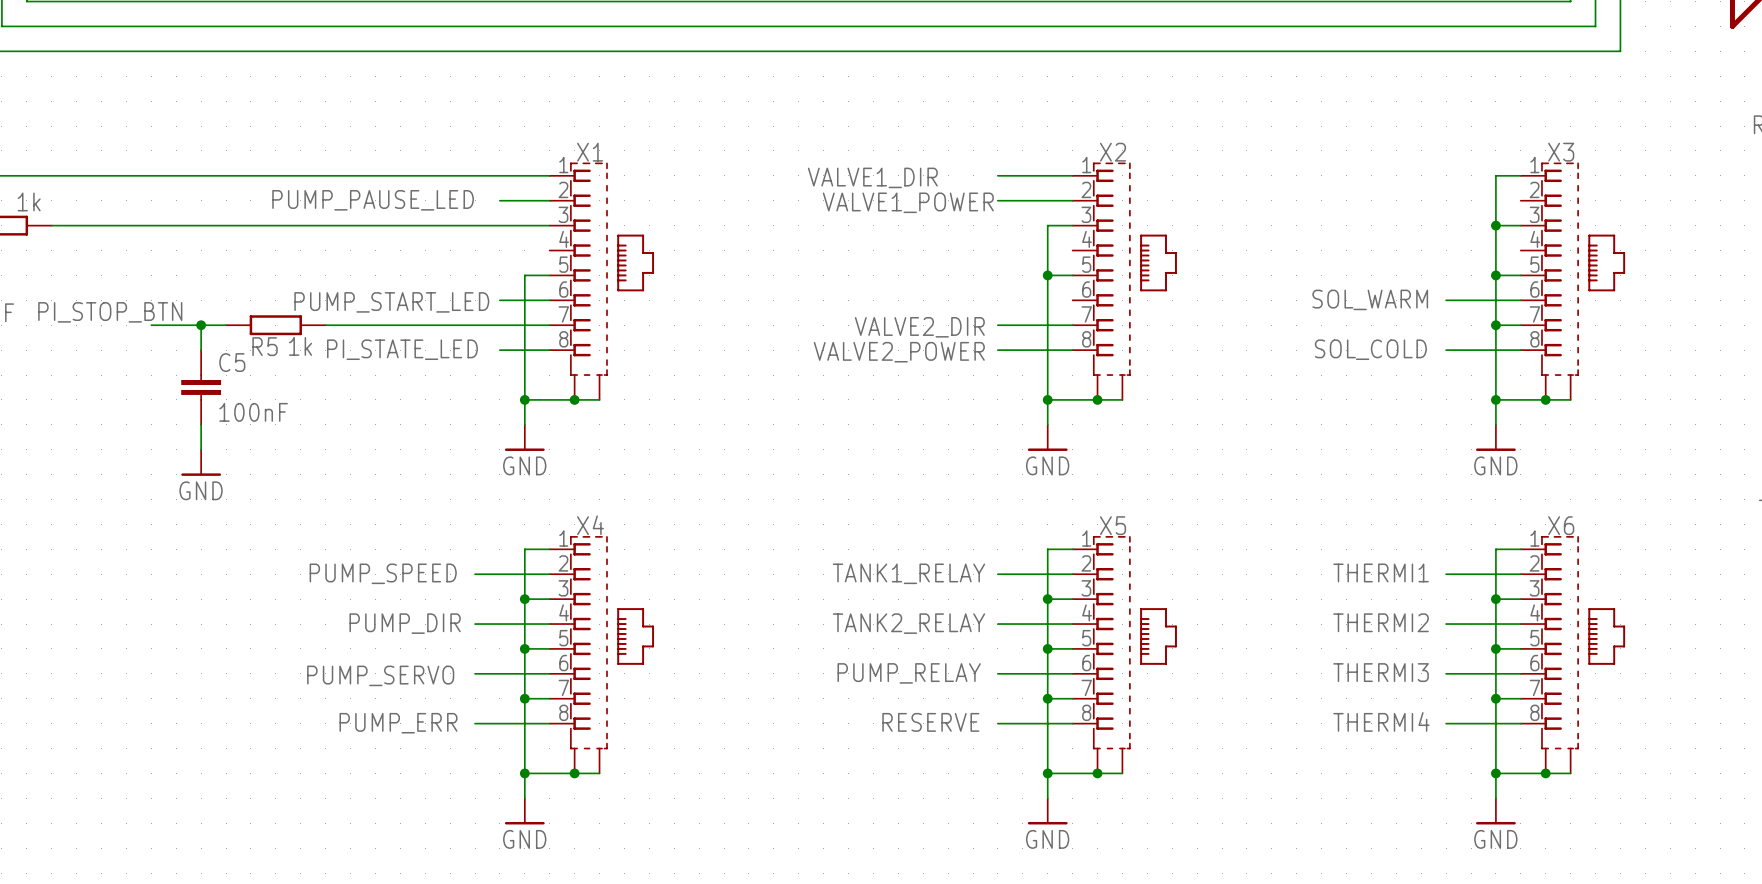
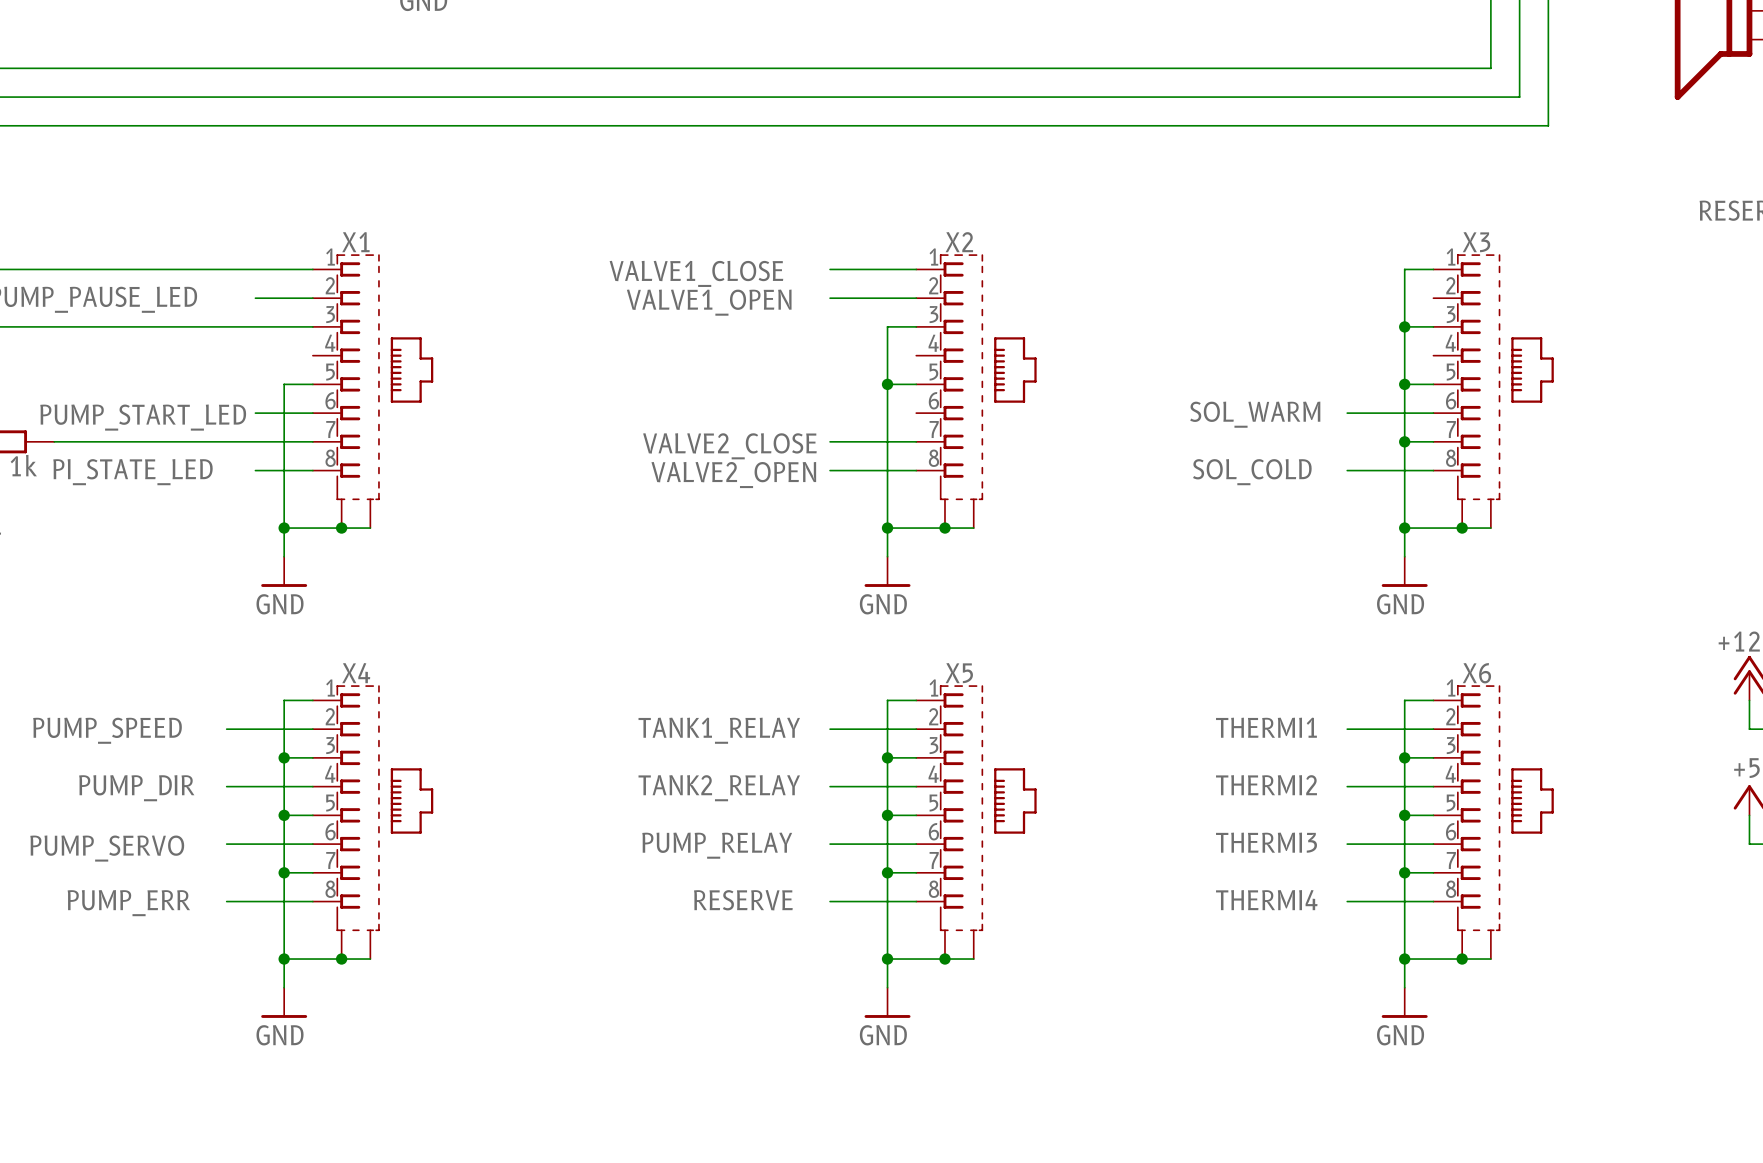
label: VALVE1_DIR (872, 177) -> VALVE1_CLOSE (696, 273)
label: VALVE1_POWER (908, 202) -> VALVE1_OPEN (709, 302)
label: VALVE2_DIR (919, 327) -> VALVE2_CLOSE (729, 446)
label: VALVE2_POWER (899, 352) -> VALVE2_OPEN (733, 475)

